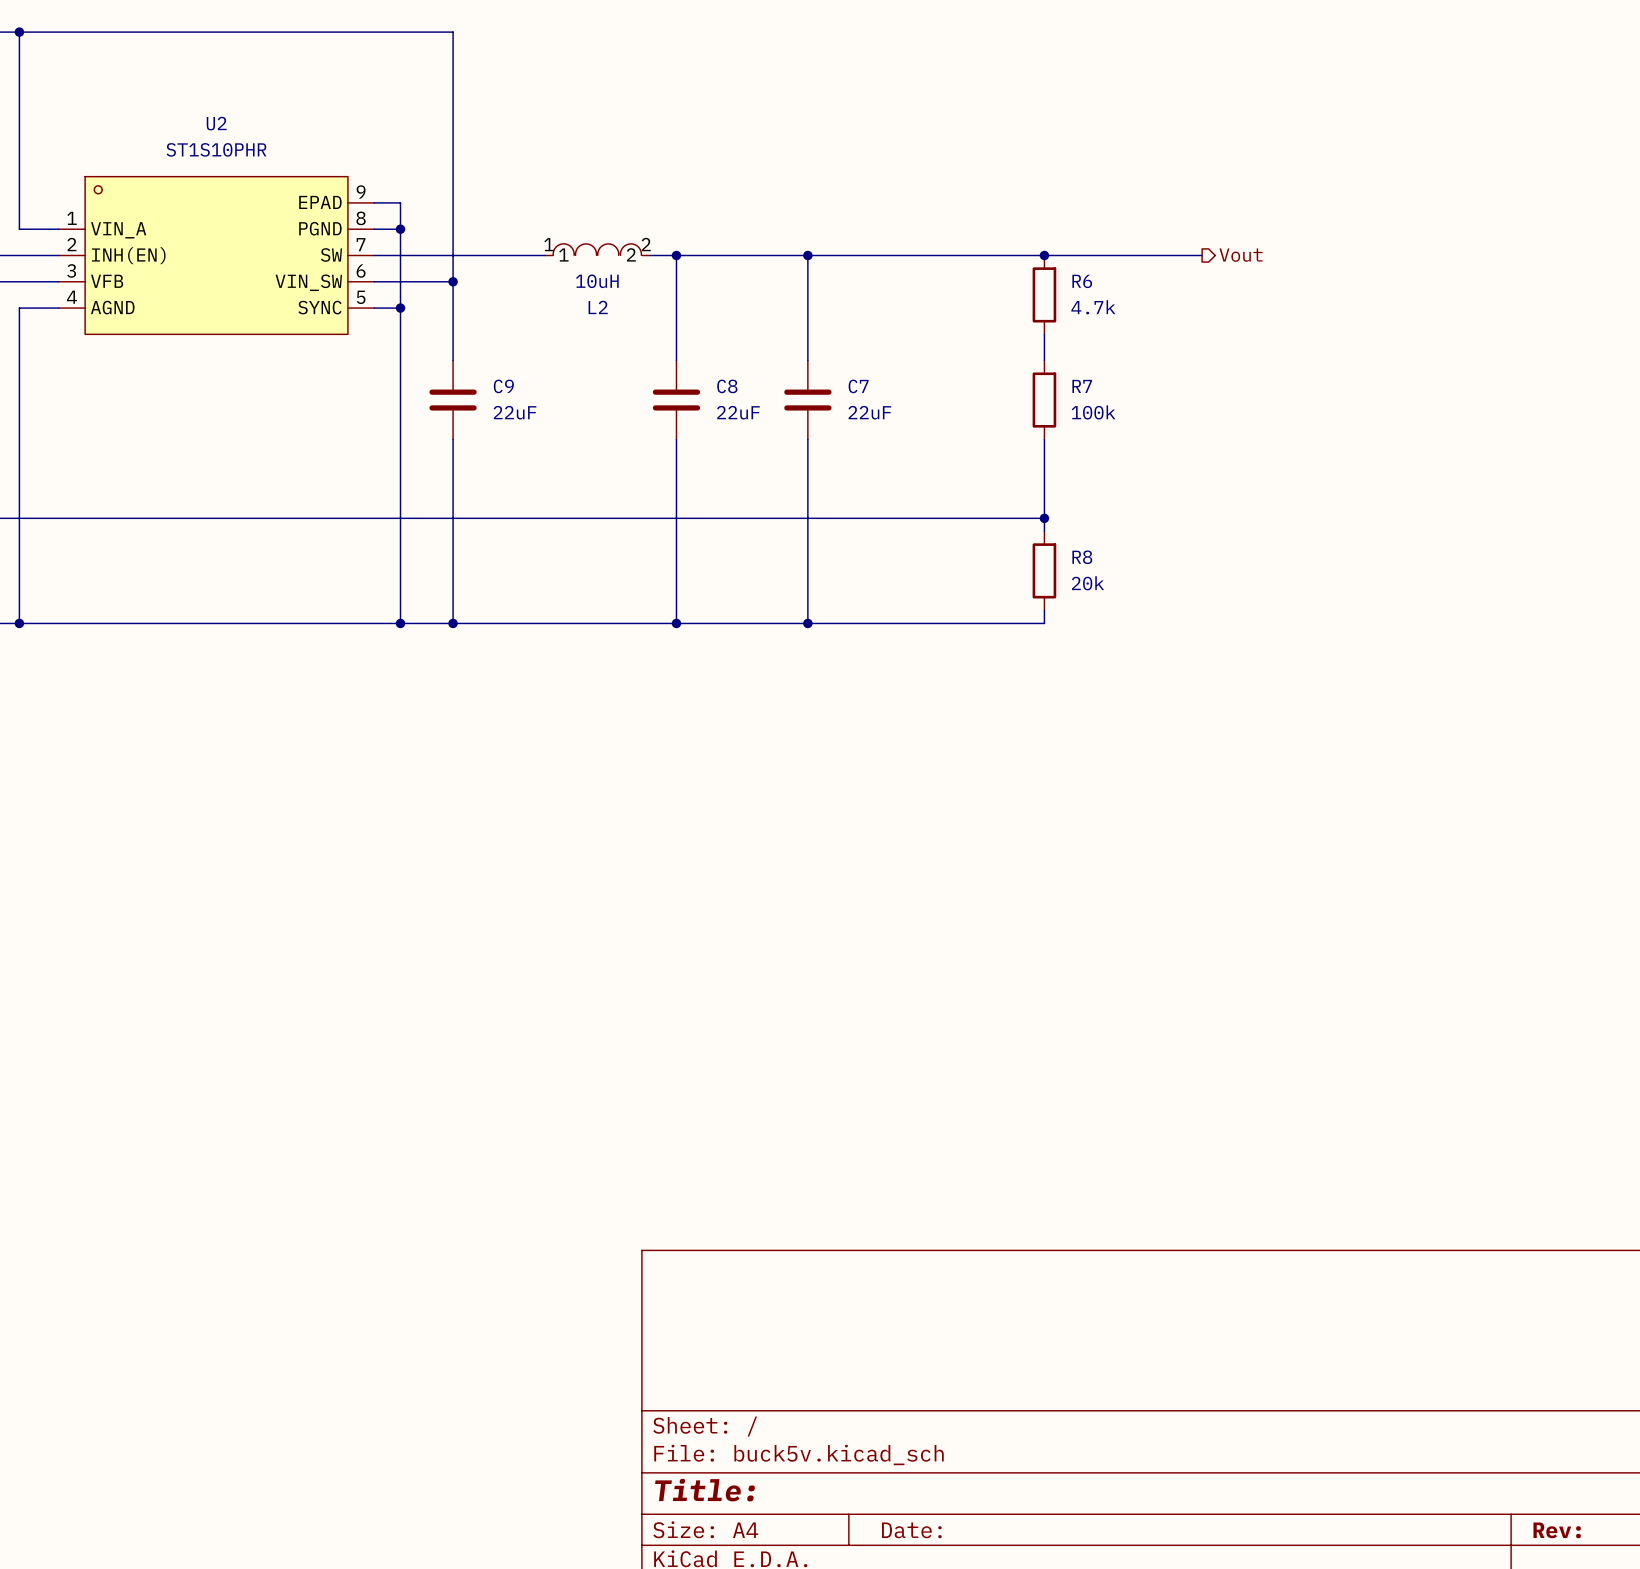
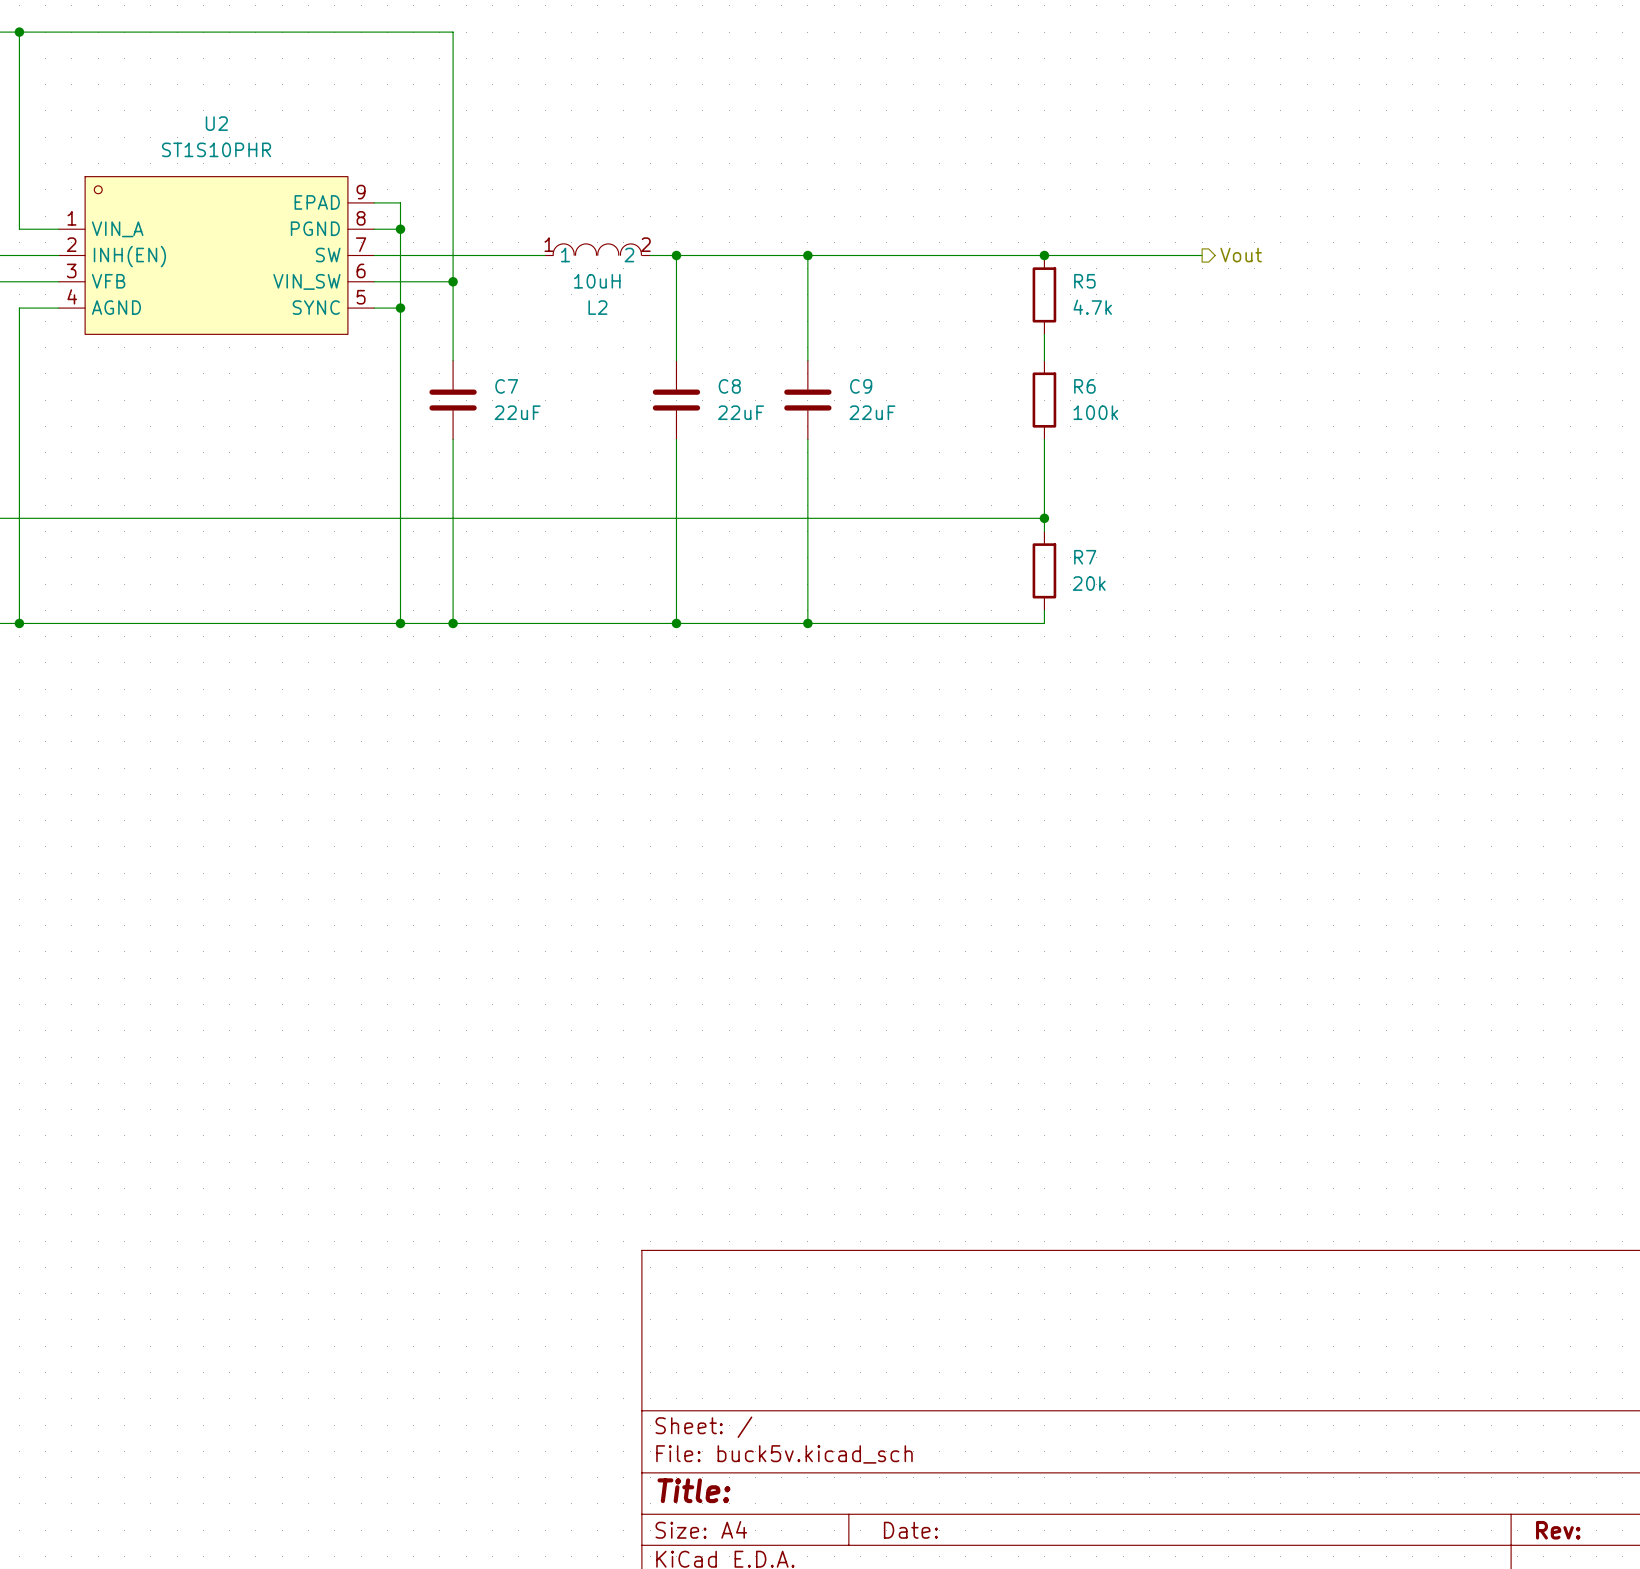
R6 name: R6 (1082, 281) -> R5 (1084, 281)
C9 name: C9 (503, 386) -> C7 (506, 386)
C7 name: C7 (858, 386) -> C9 (861, 386)
R7 name: R7 (1082, 386) -> R6 (1084, 386)
R8 name: R8 (1082, 557) -> R7 (1085, 557)

